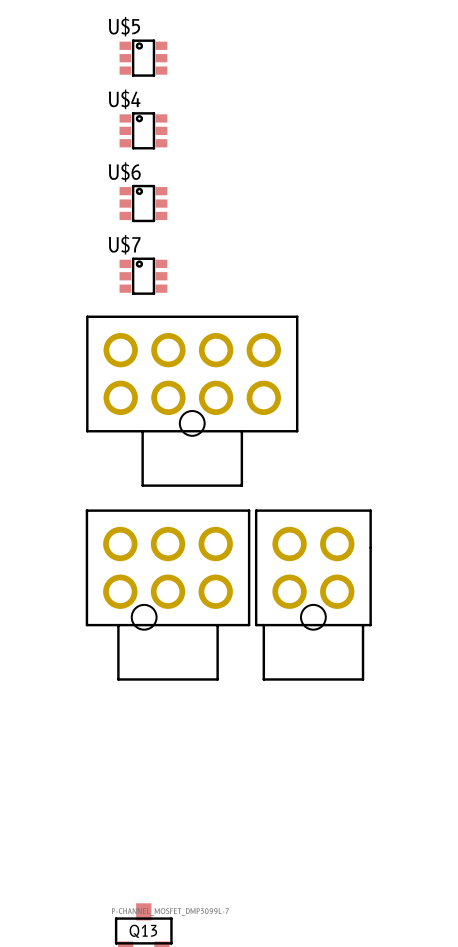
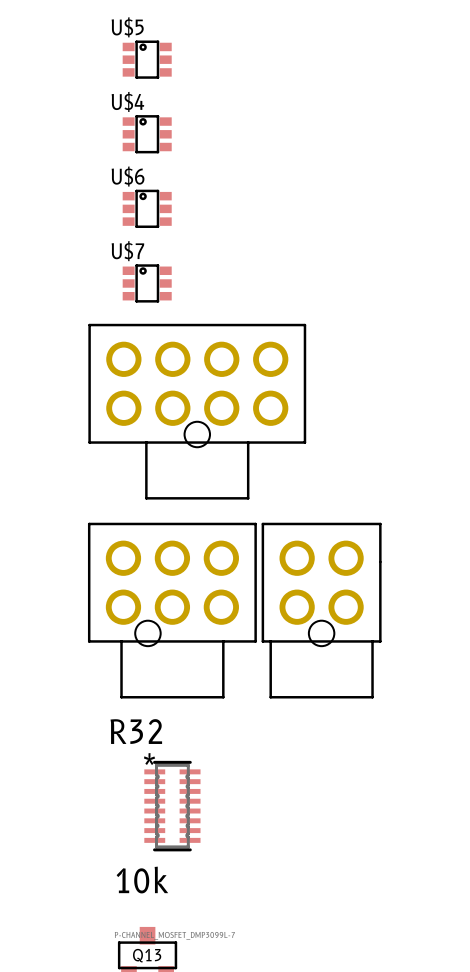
R32: none -> 10k (172, 806)

